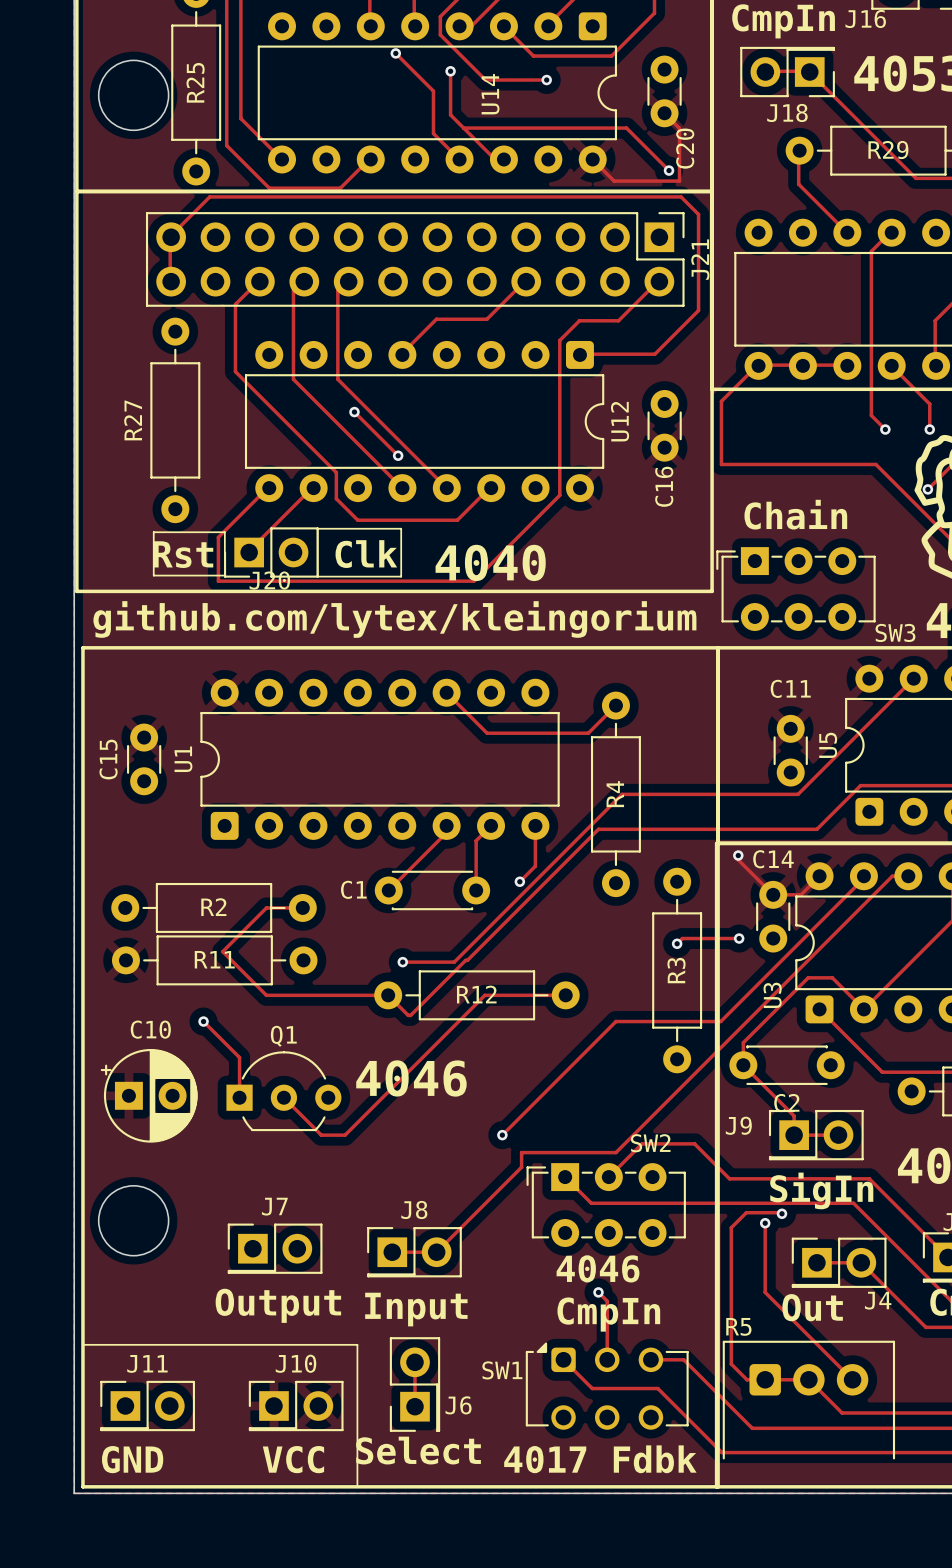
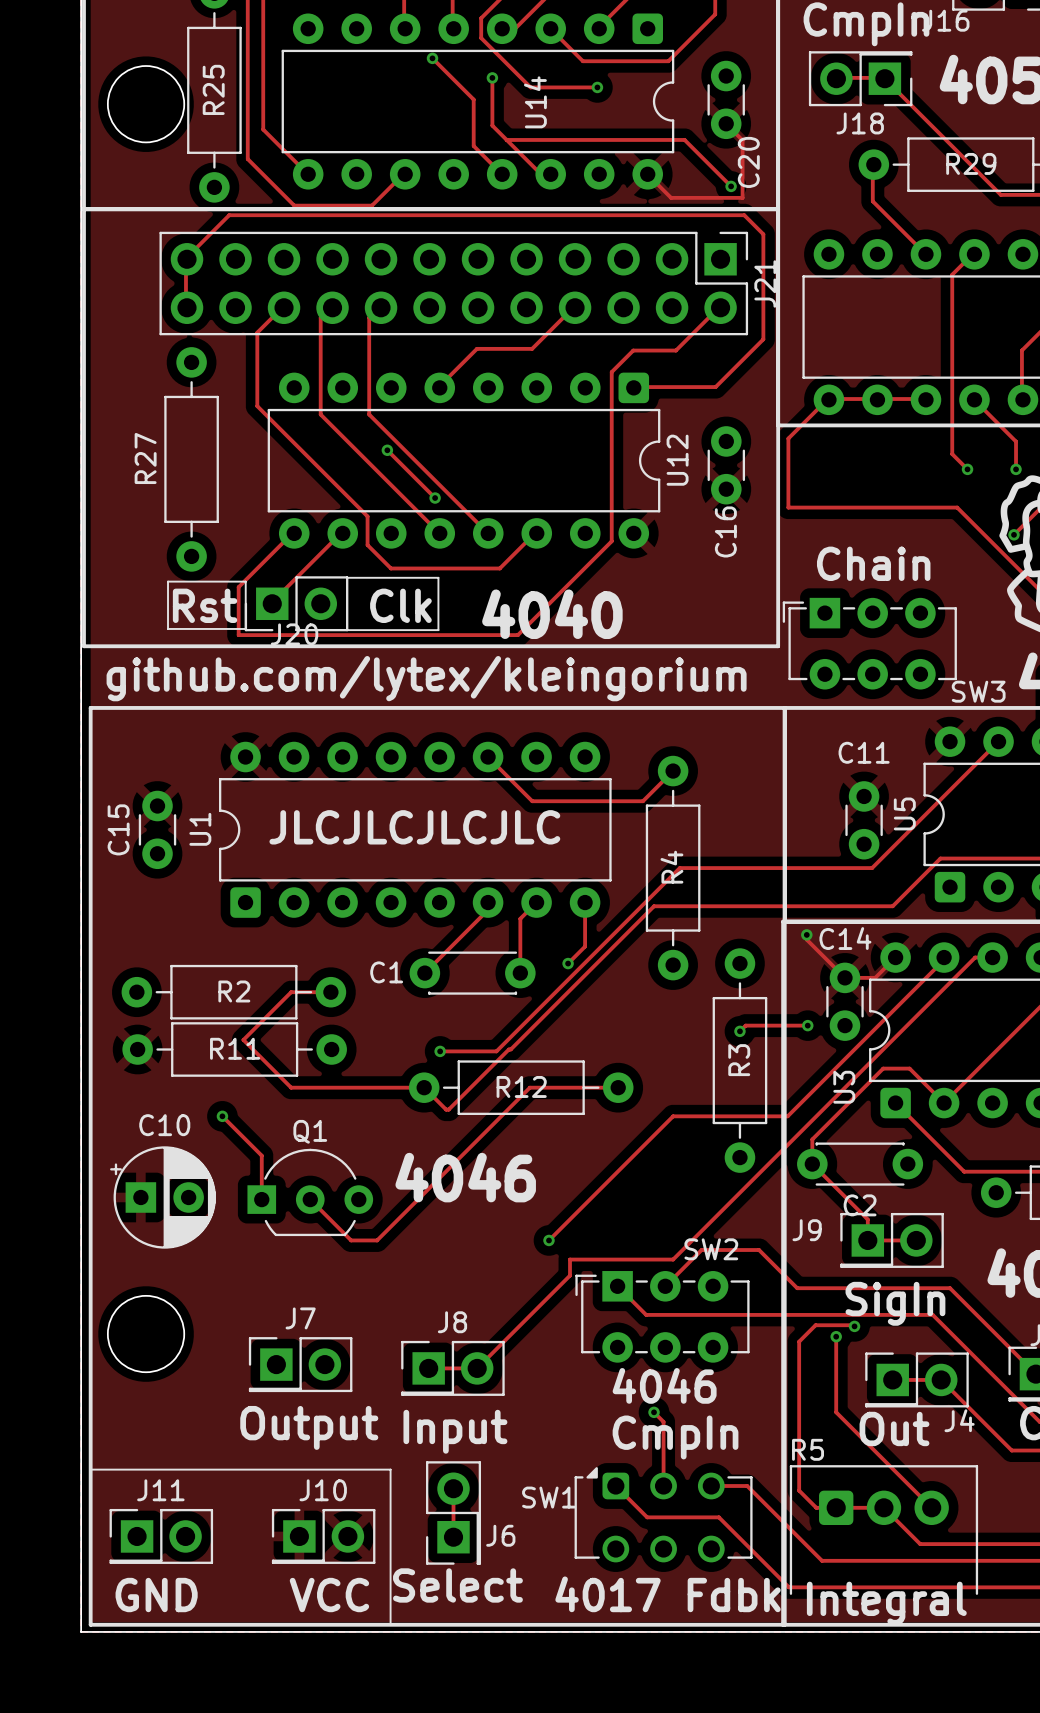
text: none -> JLCJLCJLCJLC (414, 827)
text: none -> Integral (886, 1603)

